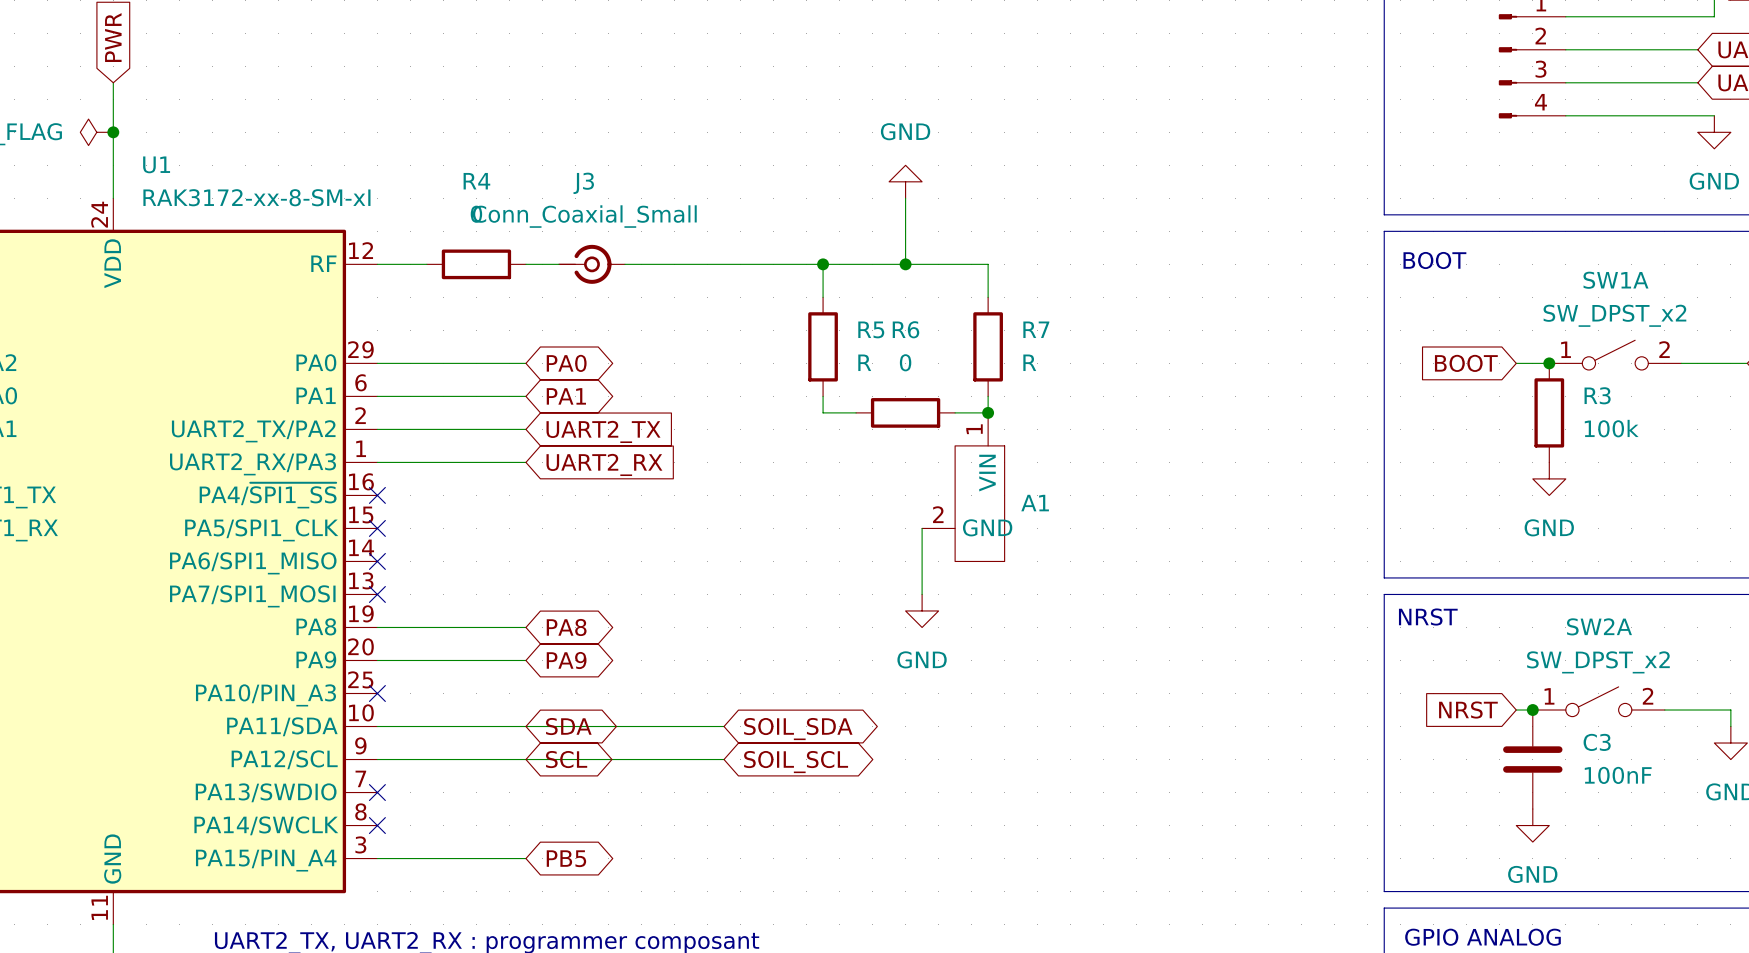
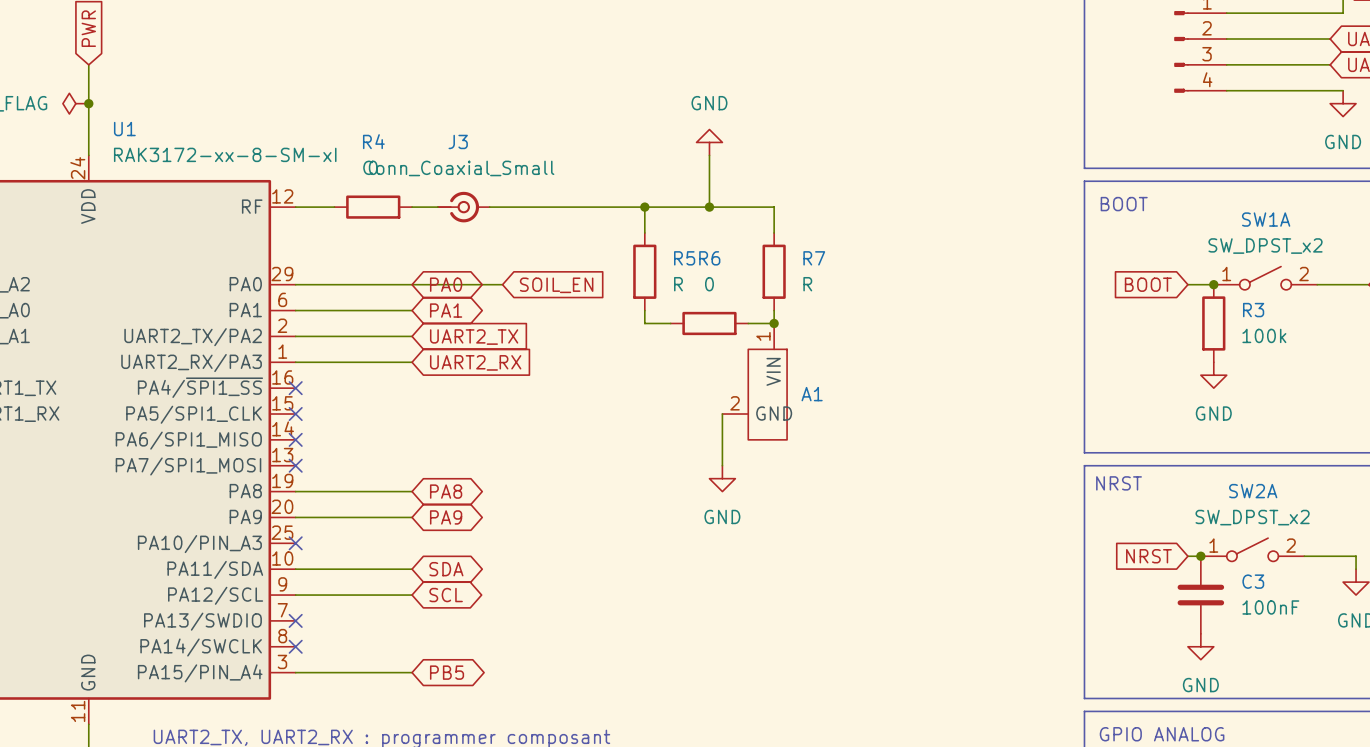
wire: none -> (412, 284) (502, 284)
global label: none -> SOIL_EN (556, 285)
wire: (525, 726) (724, 726) -> none
global label: SOIL_SDA (798, 729) -> none
wire: (525, 759) (724, 759) -> none
global label: SOIL_SCL (796, 762) -> none

